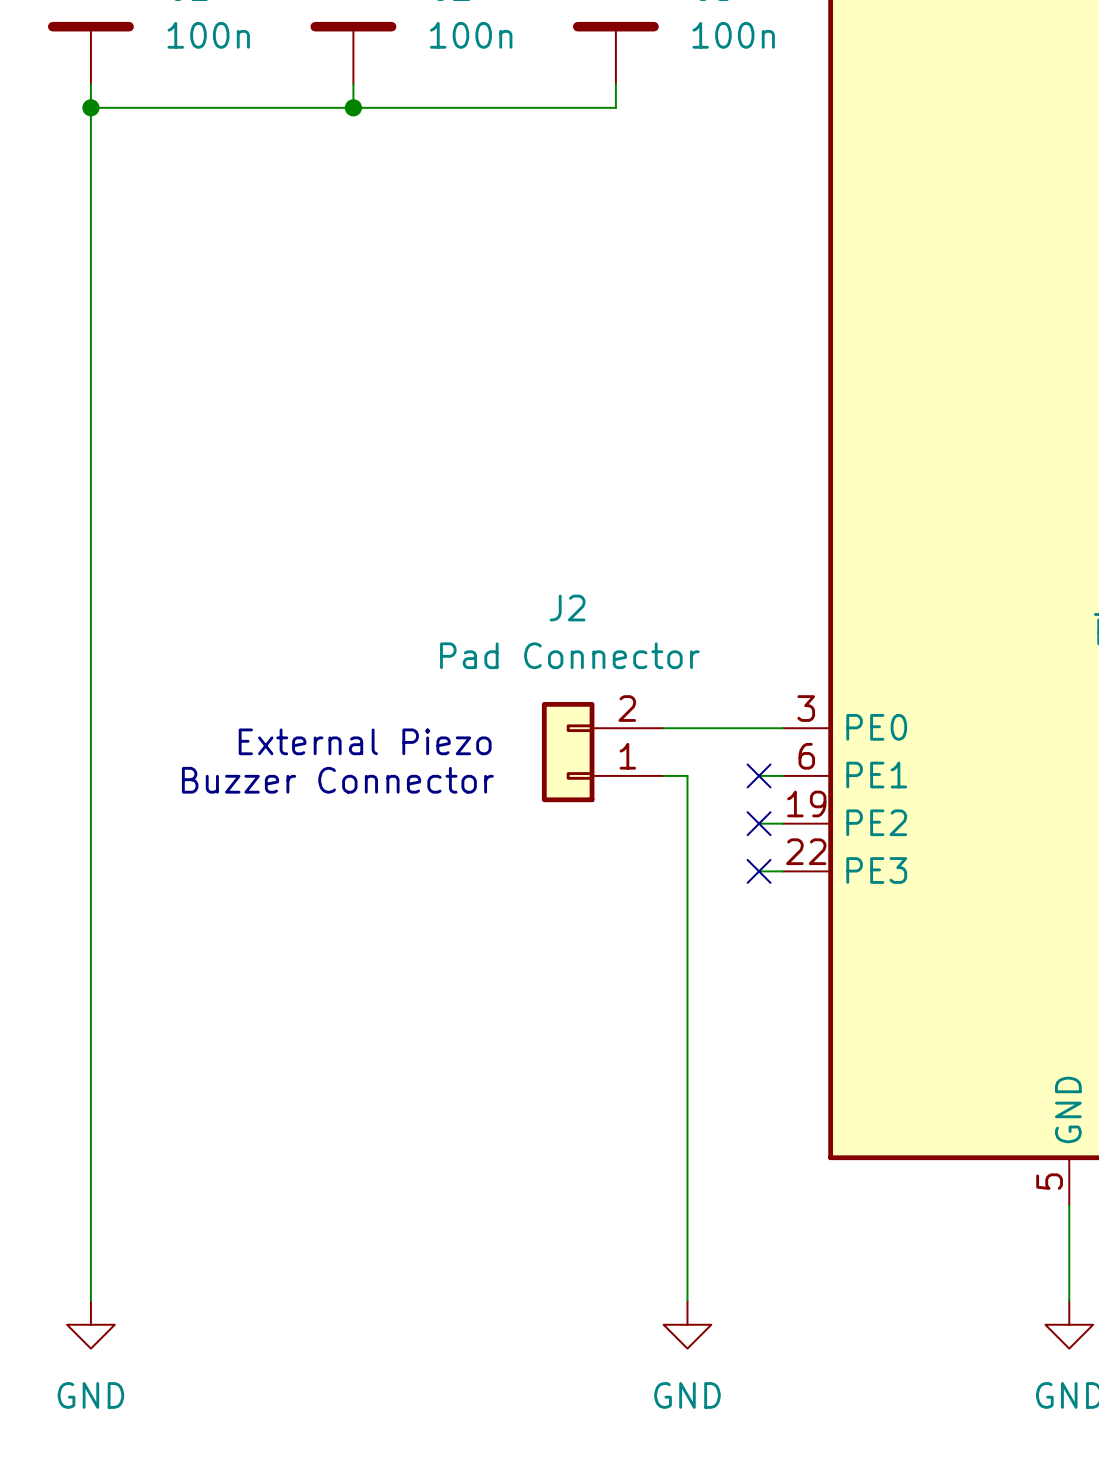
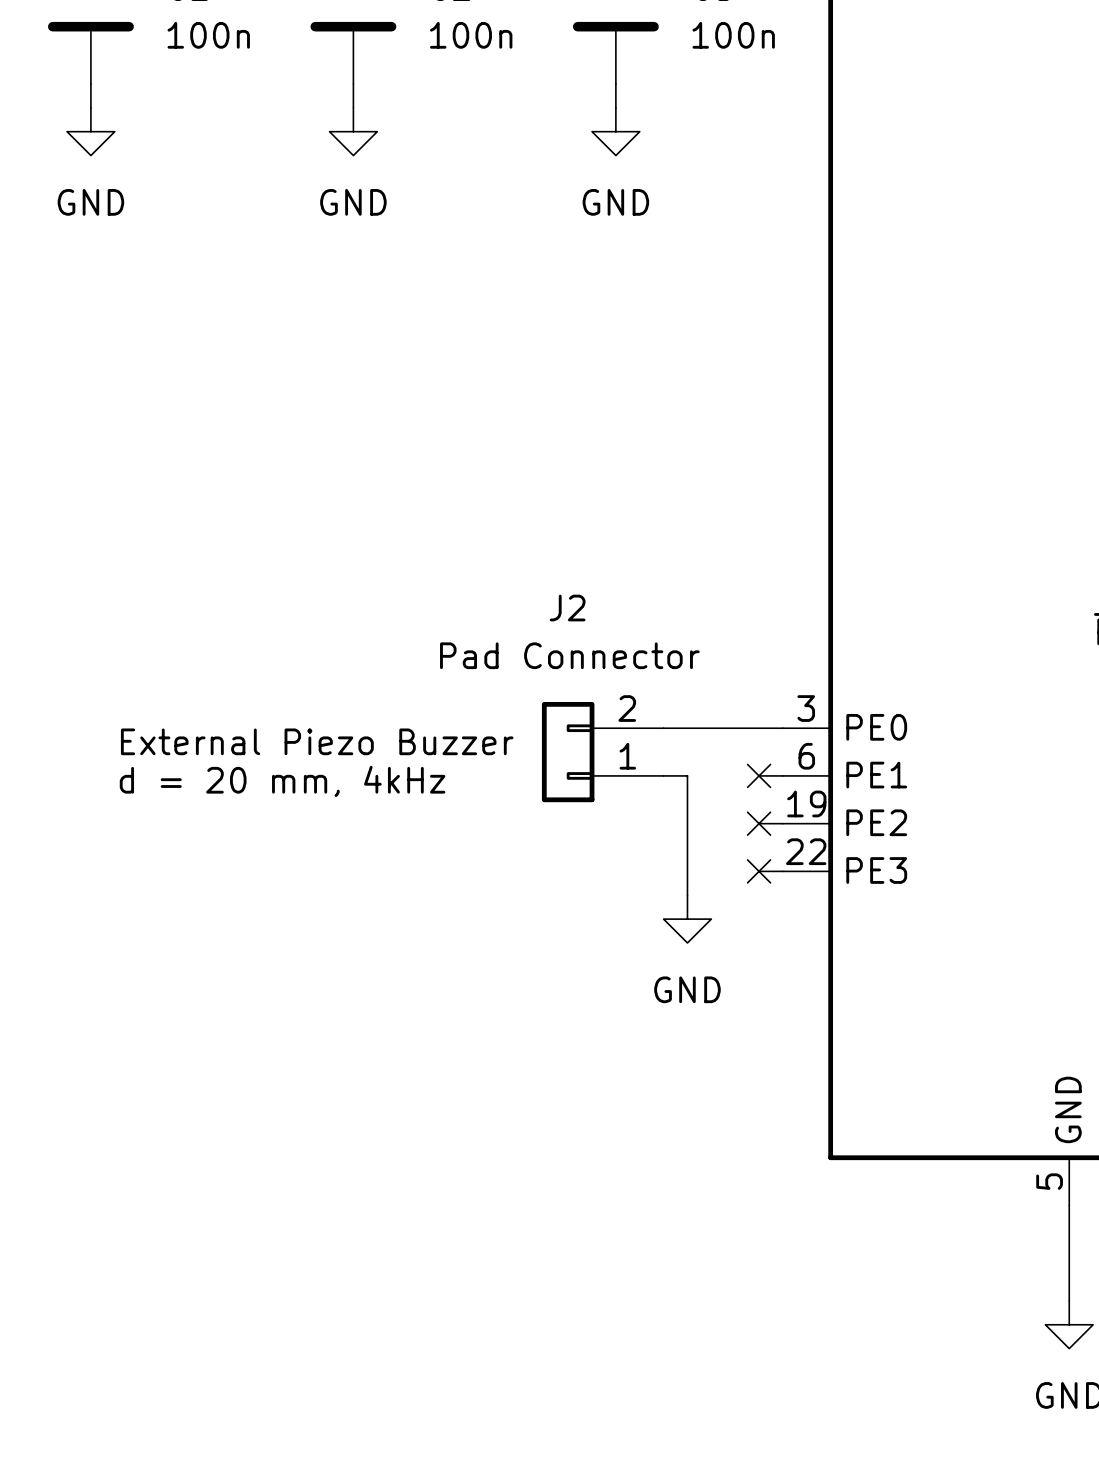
junction: (90, 107) -> none
junction: (353, 107) -> none
wire: (615, 107) (90, 107) (90, 1300) -> none
power symbol: none -> GND (90, 131)
power symbol: none -> GND (353, 131)
power symbol: none -> GND (615, 131)
text: External Piezo (365, 741) -> External Piezo Buzzer (317, 741)
text: Buzzer Connector (337, 780) -> none
text: none -> d = 20 mm, 4kHz (282, 781)
wire: (687, 895) (687, 1300) -> none
power symbol: none -> GND (687, 919)
power symbol: GND (90, 1324) -> none
power symbol: GND (687, 1324) -> none

